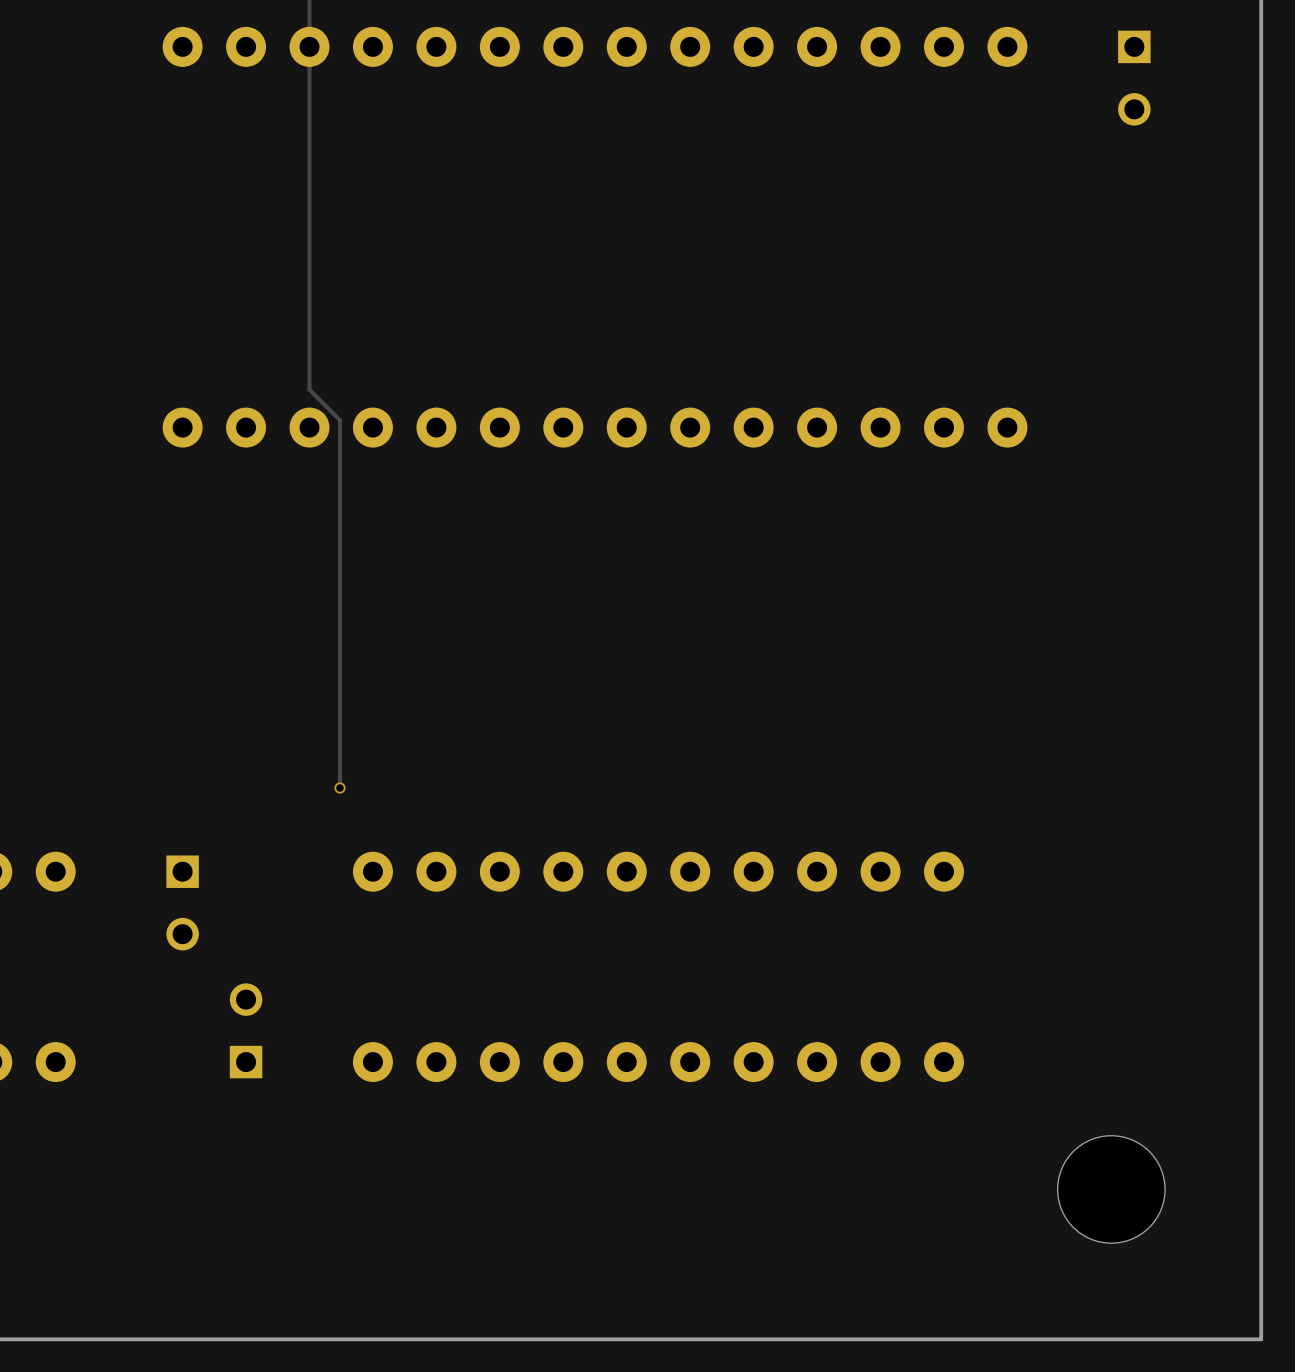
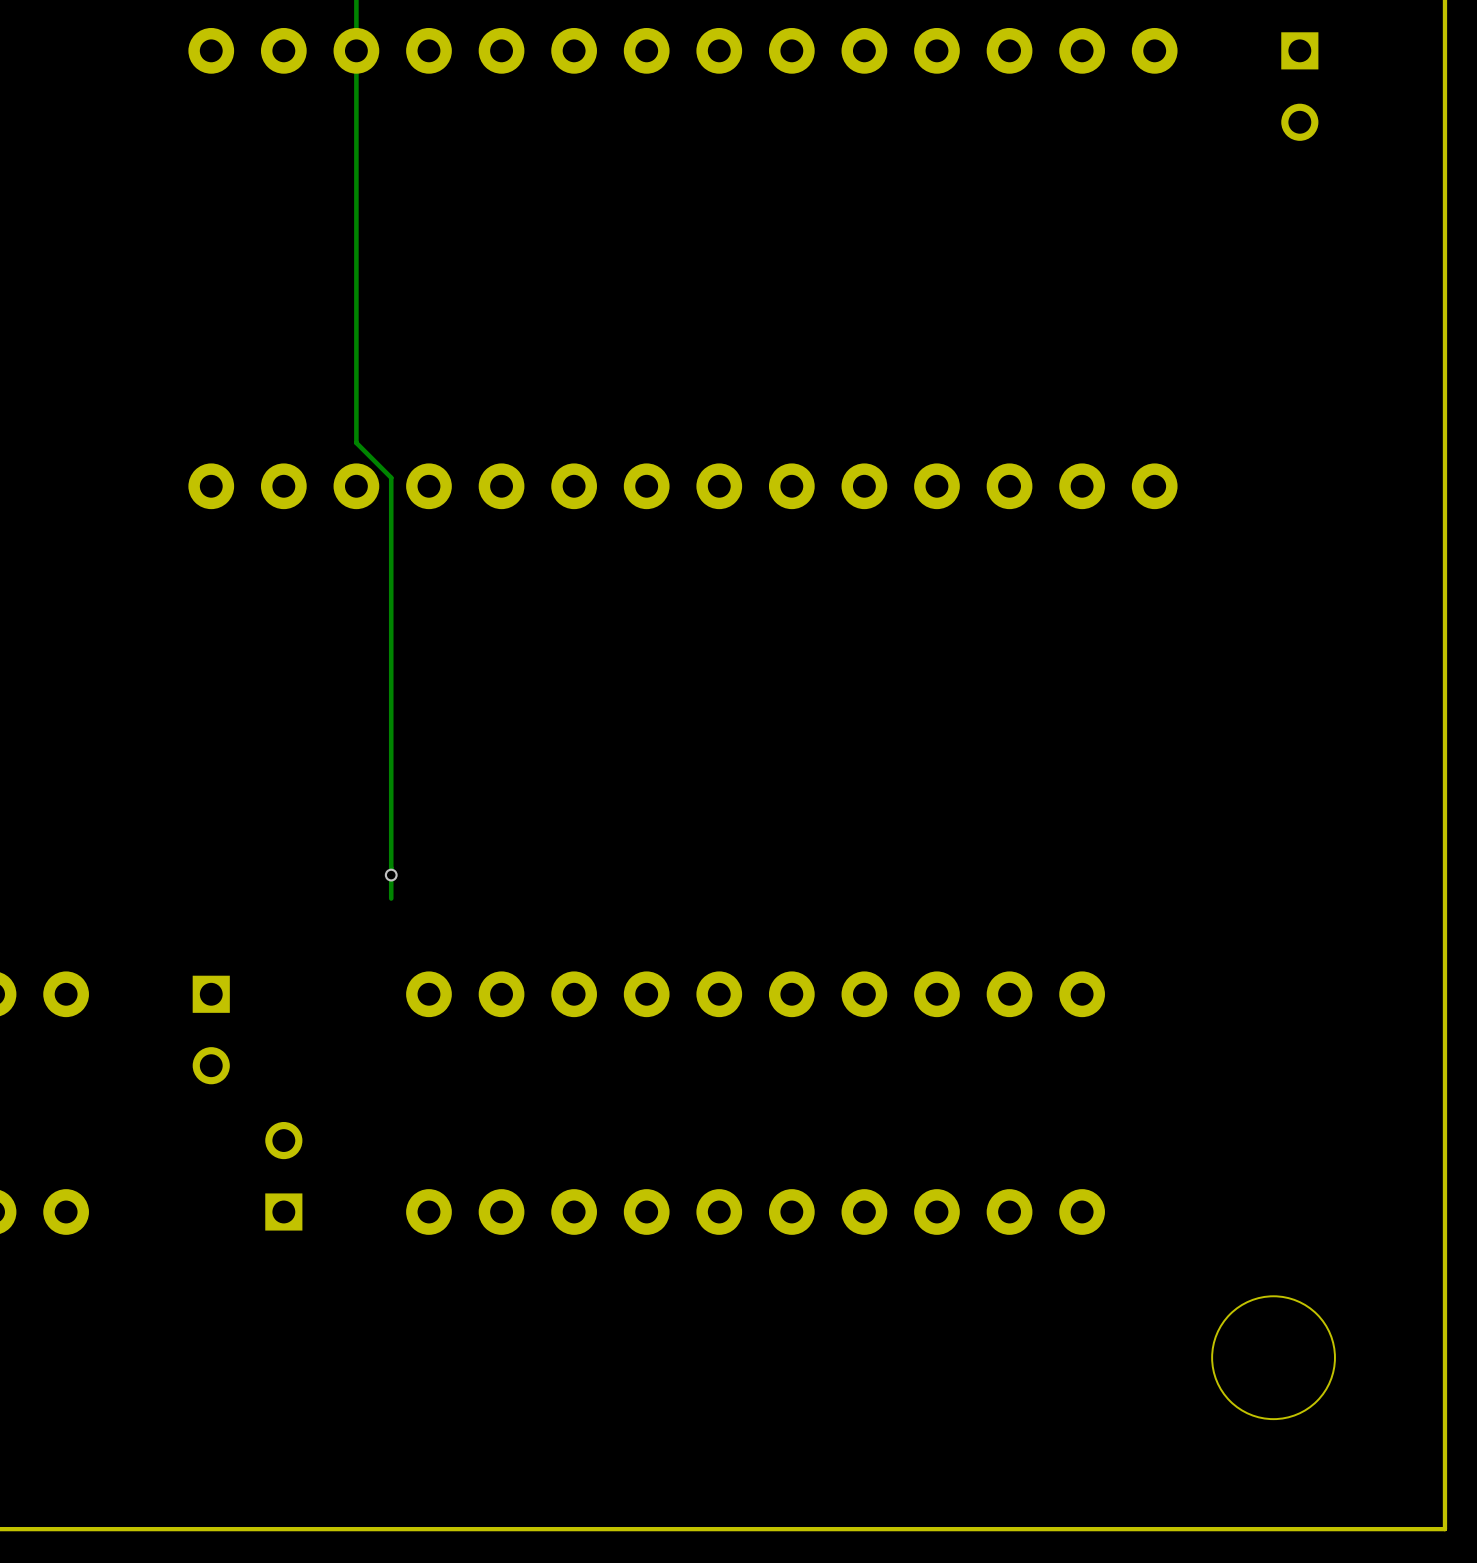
via position: (339, 788) -> (391, 875)

